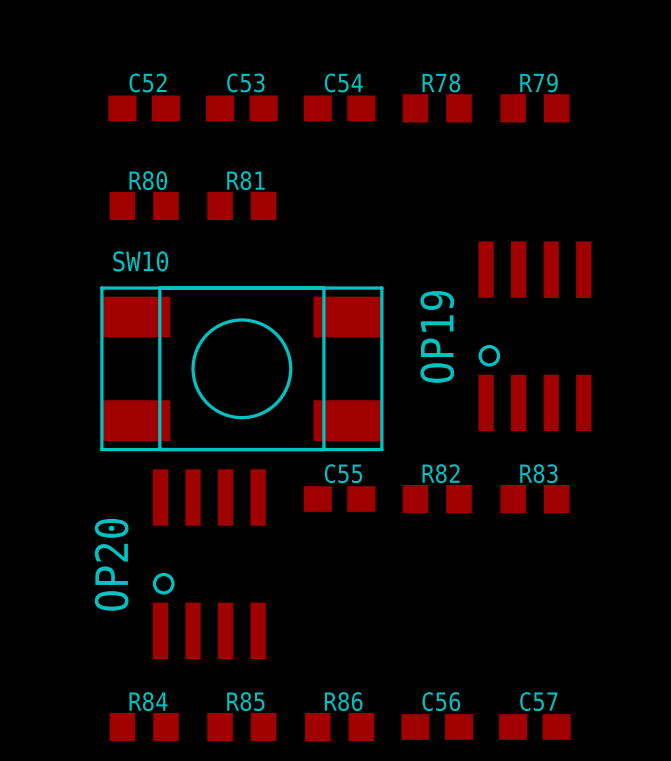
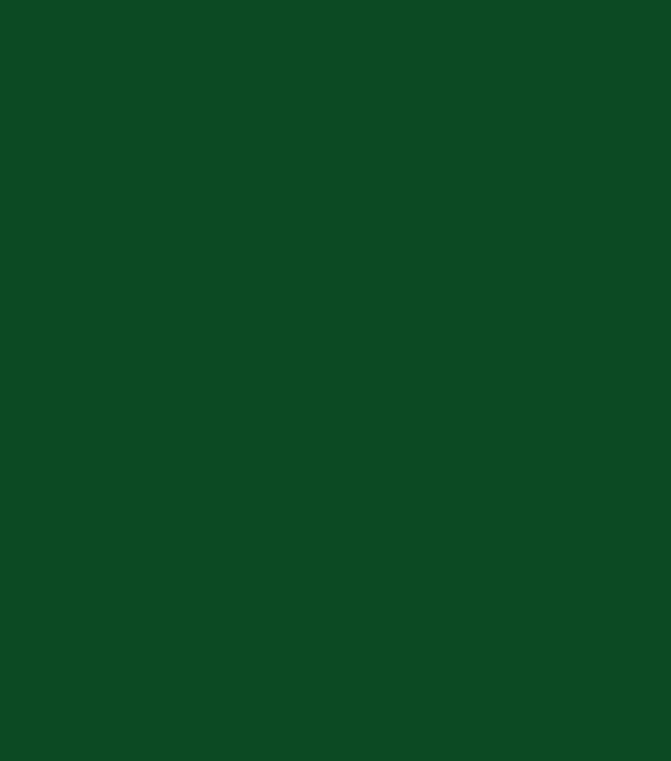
C52: (144, 108) -> none
C53: (241, 108) -> none
C54: (339, 108) -> none
R78: (437, 108) -> none
R79: (534, 108) -> none
R80: (144, 206) -> none
R81: (241, 206) -> none
OP19: (534, 336) -> none
SW10: (241, 368) -> none
C55: (339, 499) -> none
R82: (437, 499) -> none
R83: (534, 499) -> none
OP20: (209, 564) -> none
R84: (144, 726) -> none
R85: (241, 726) -> none
R86: (339, 726) -> none
C56: (437, 726) -> none
C57: (534, 726) -> none

